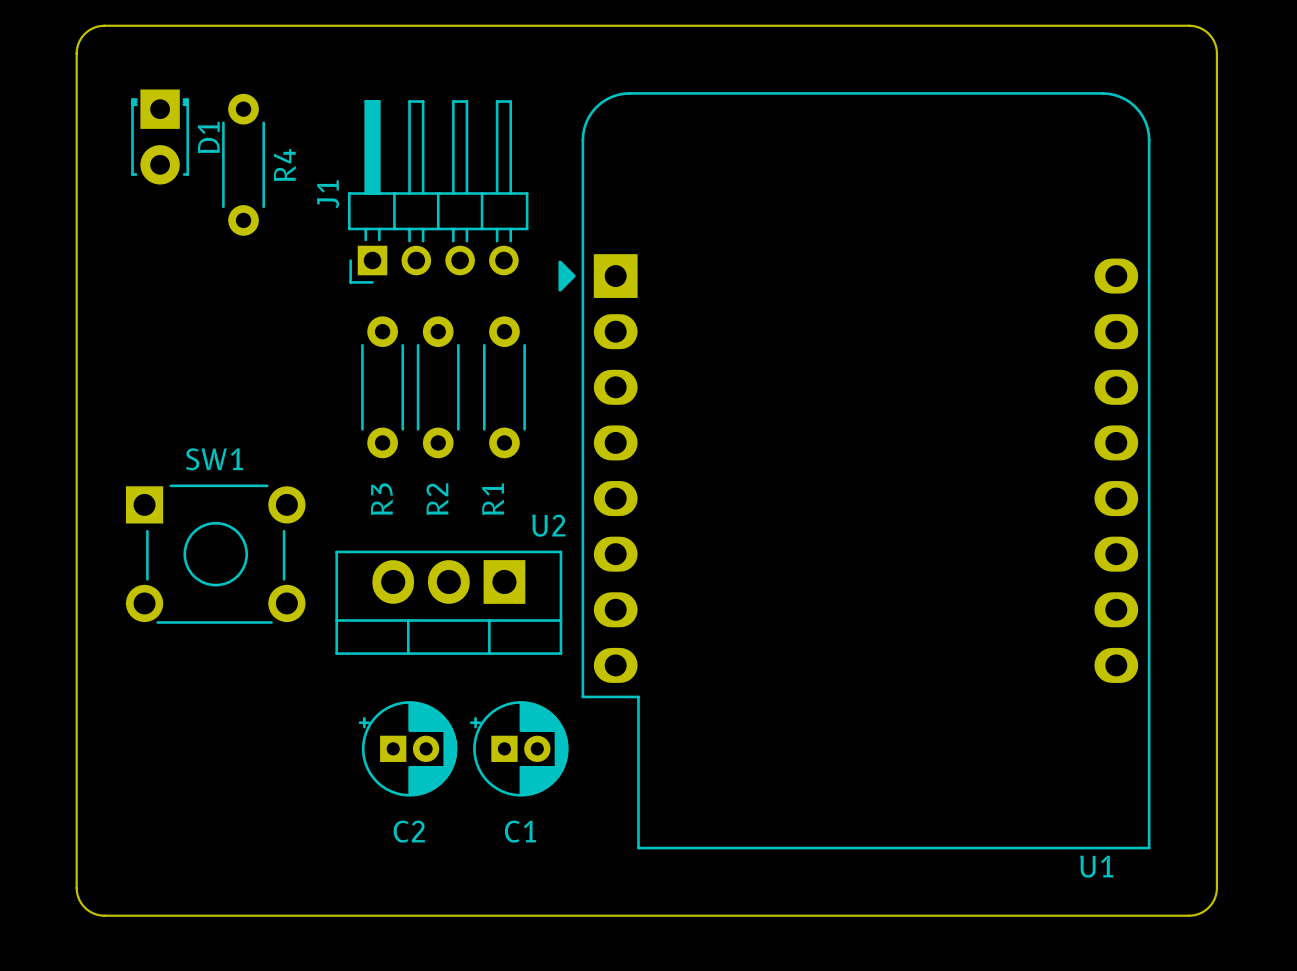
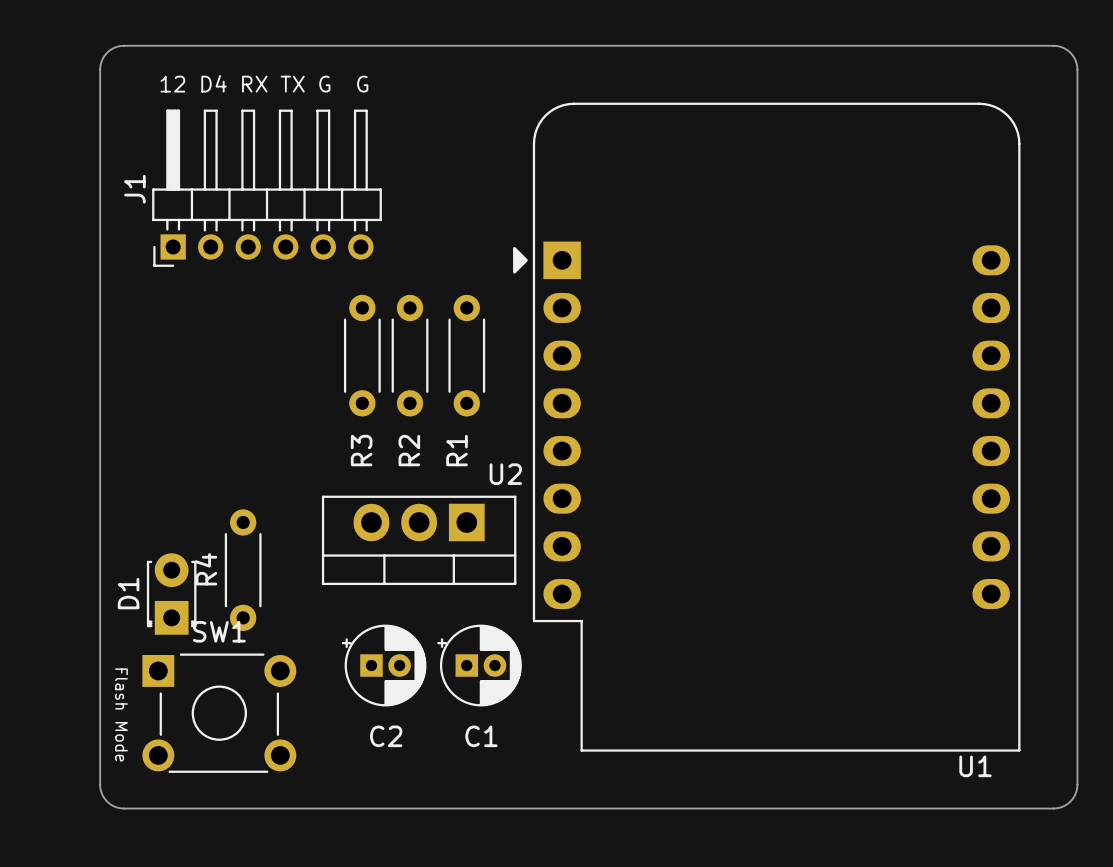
text: none -> 12 D4 RX TX G G (264, 83)
J1 footprint: [347, 100, 529, 284] -> [152, 109, 382, 267]
D1 rotation: 0° (160, 137) -> 180° (171, 594)
D1 position: (160, 137) -> (171, 594)
R4 position: (243, 164) -> (243, 570)
R4 name position: R4 (284, 165) -> R4 (205, 569)
SW1 position: (215, 554) -> (219, 713)
text: none -> Flash Mode (121, 714)

